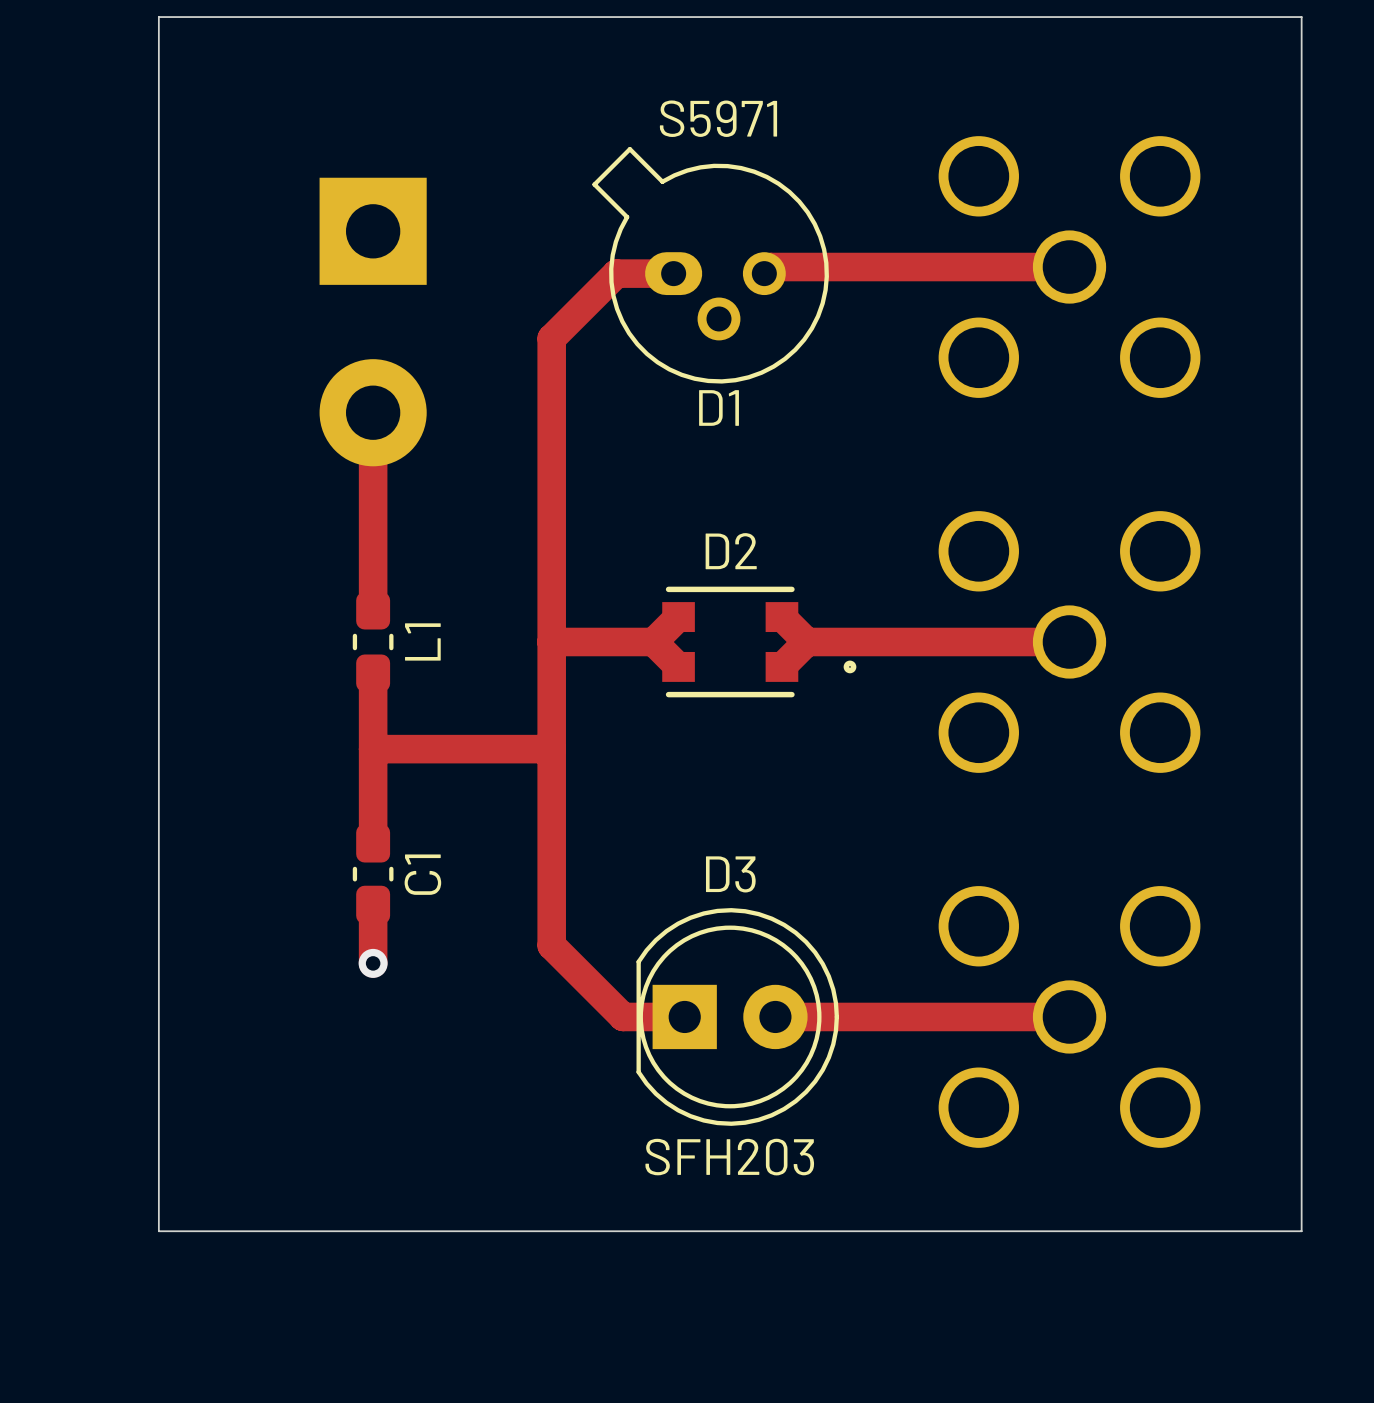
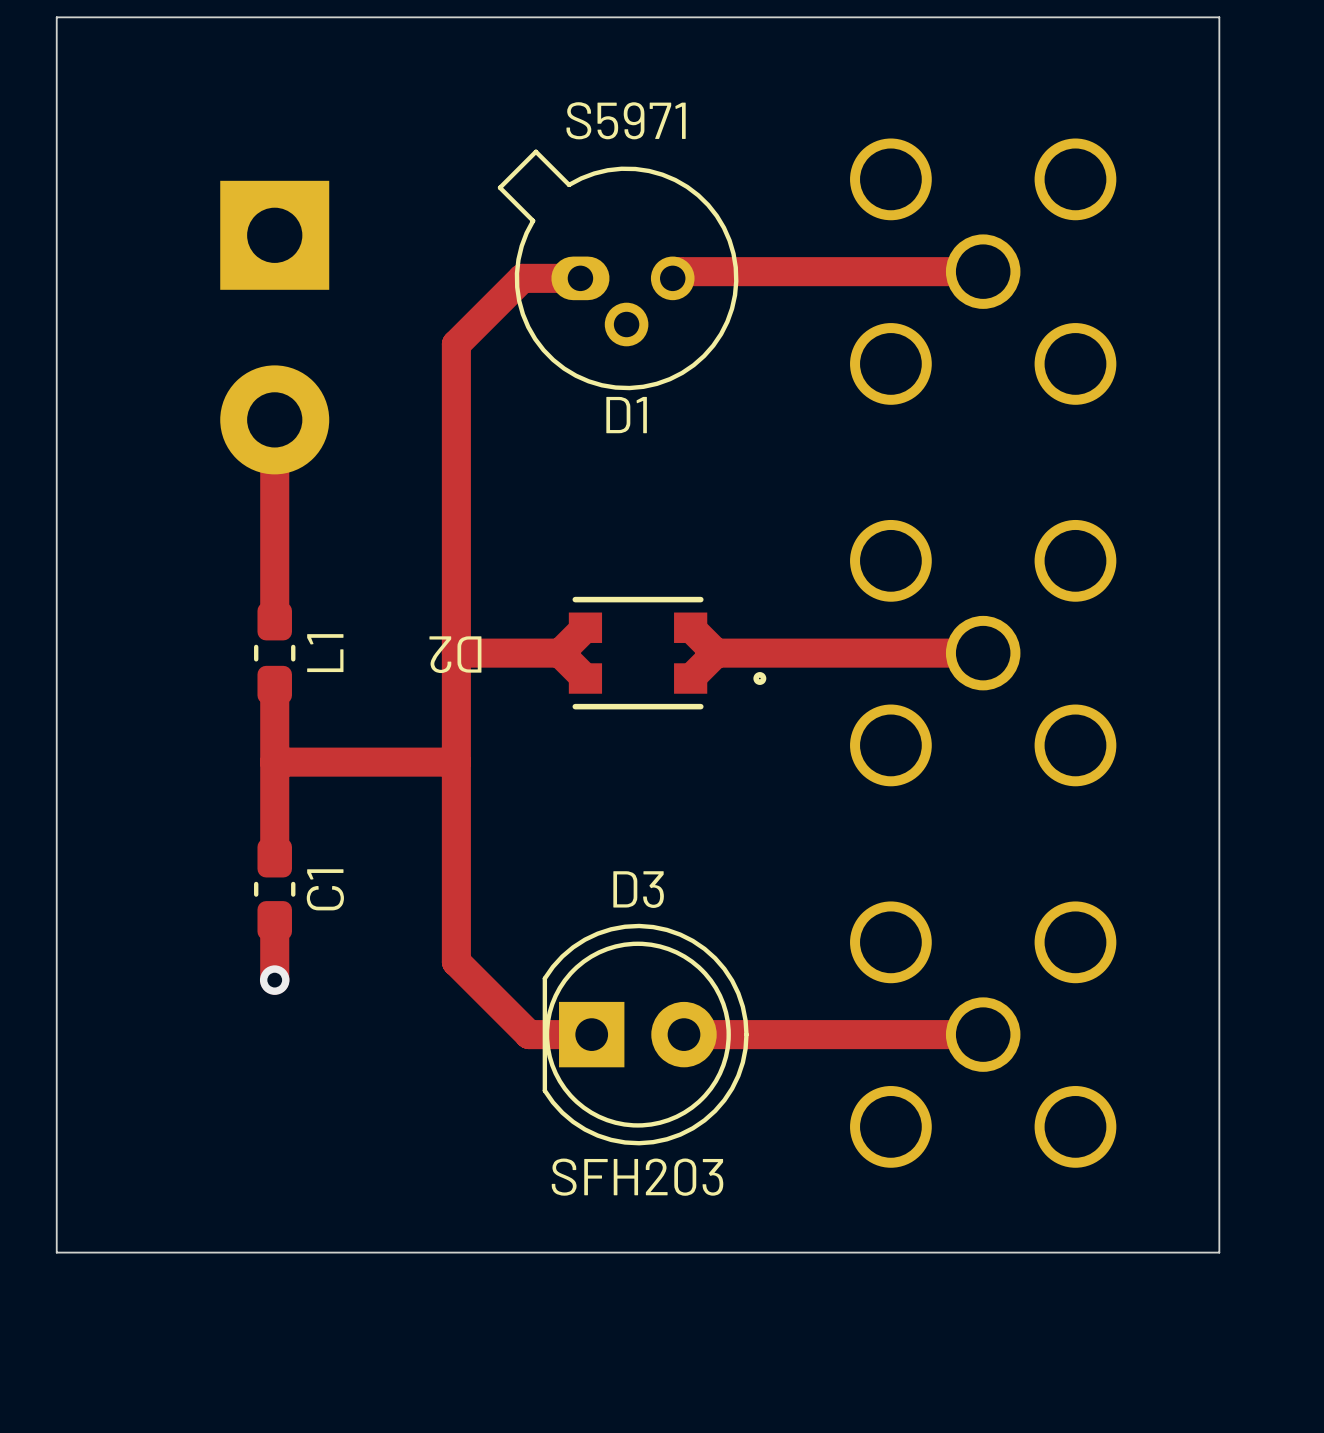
D2 name rotation: 0° (731, 551) -> 180° (455, 654)
D2 name position: D2 (731, 551) -> D2 (455, 654)

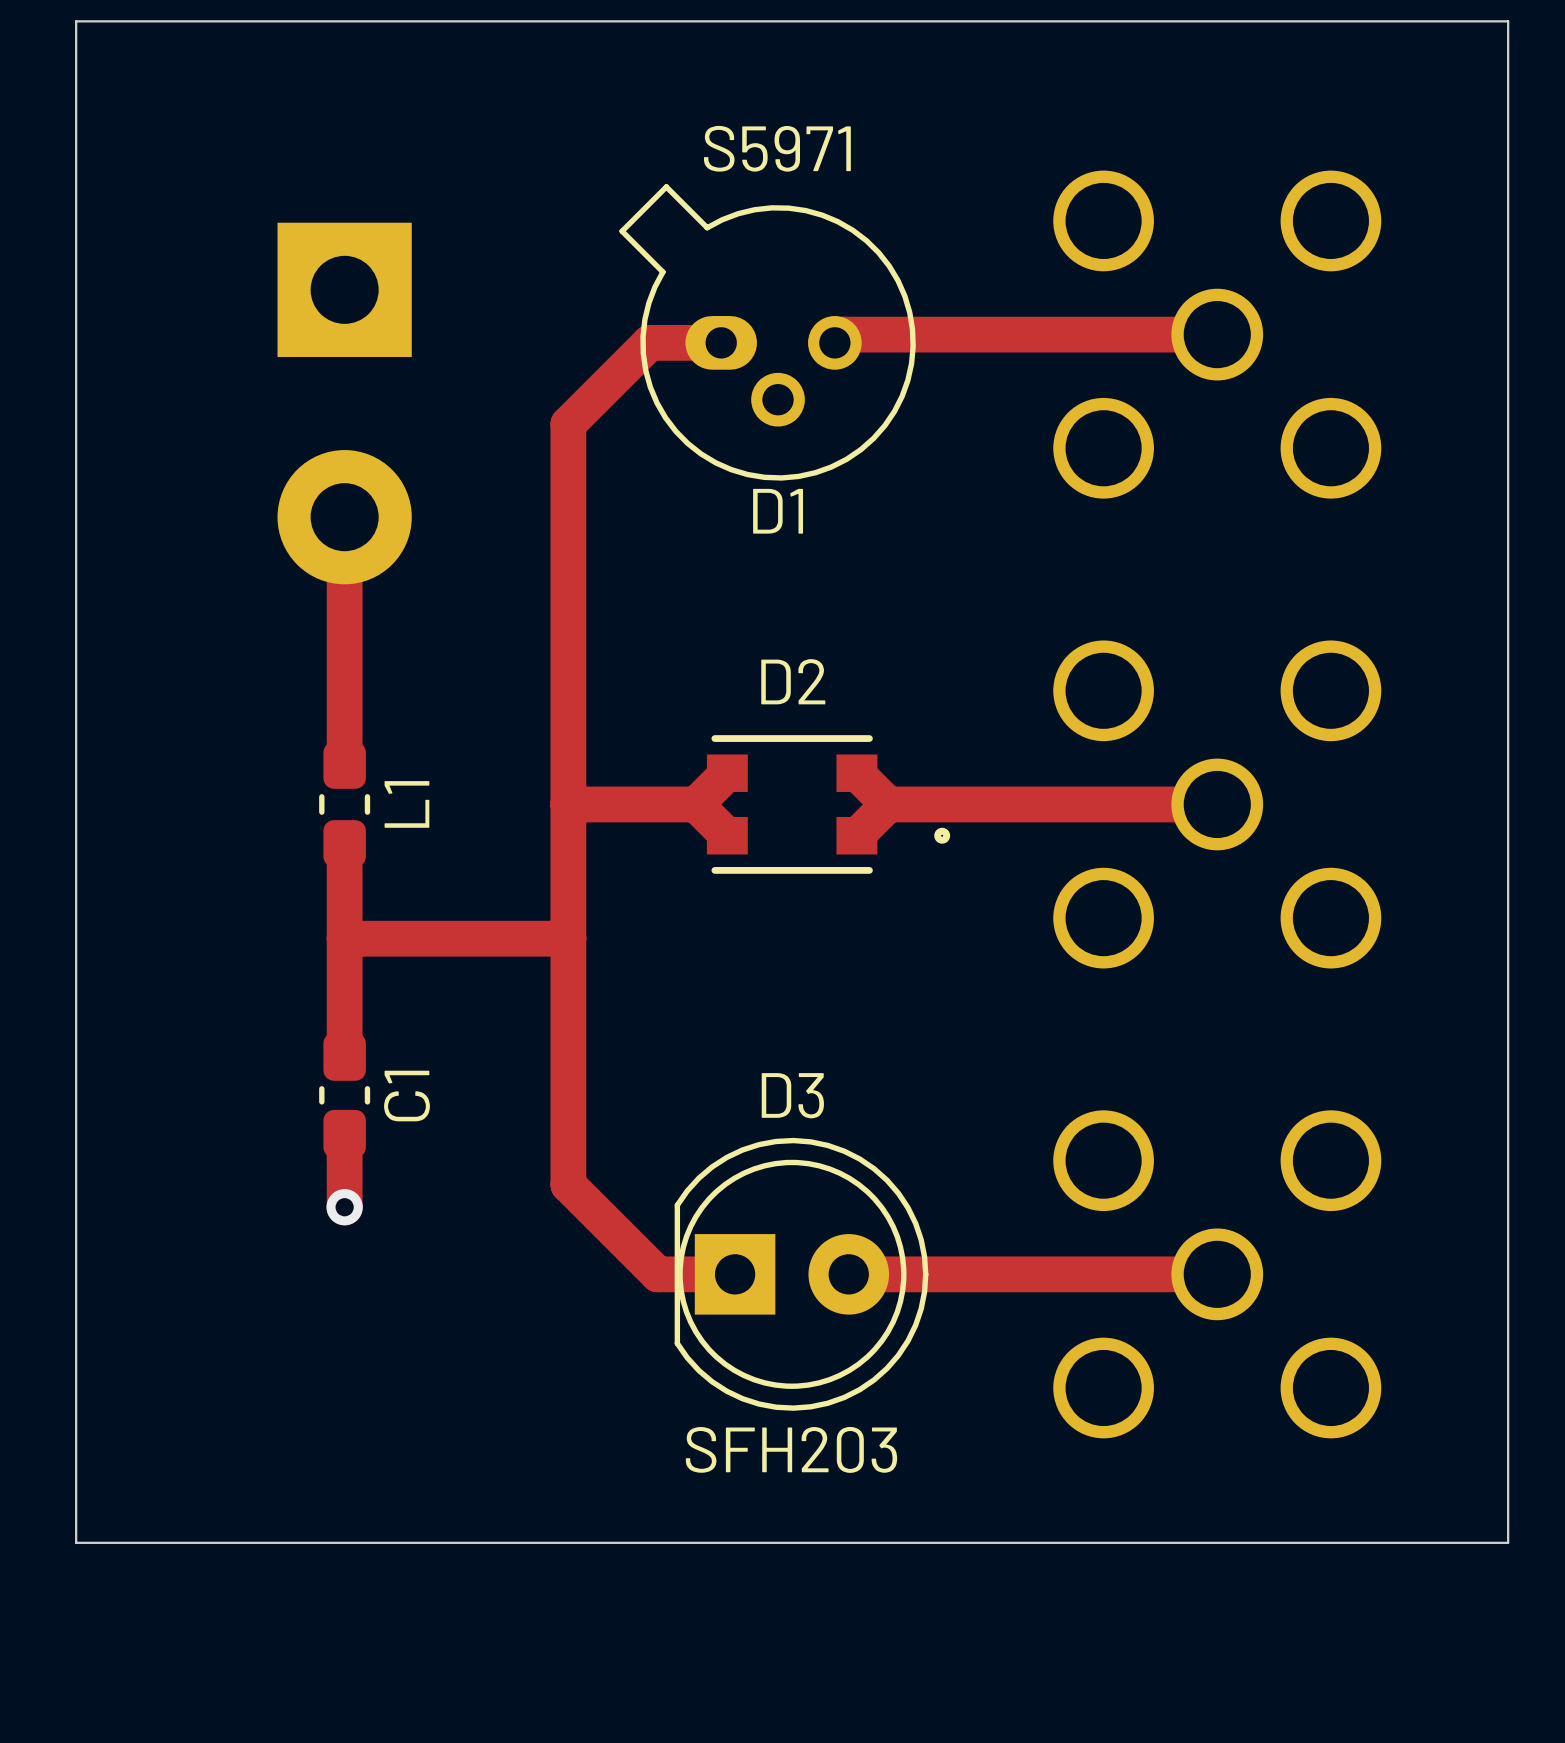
D2 name rotation: 0° (455, 654) -> 180° (793, 681)
D2 name position: D2 (455, 654) -> D2 (793, 681)

